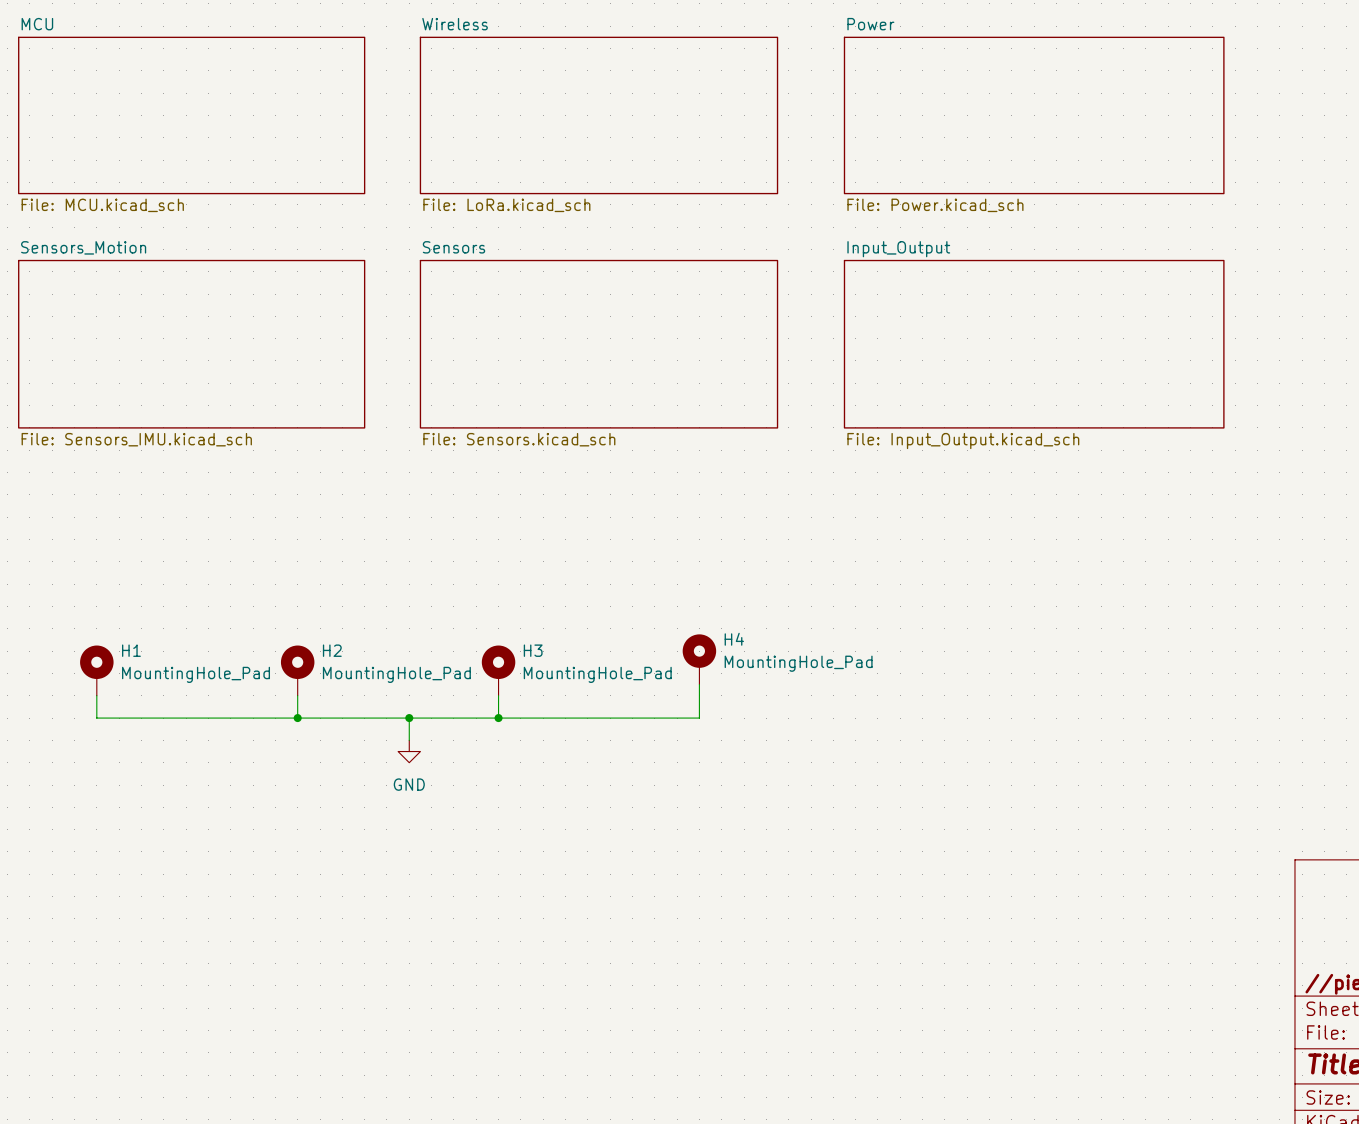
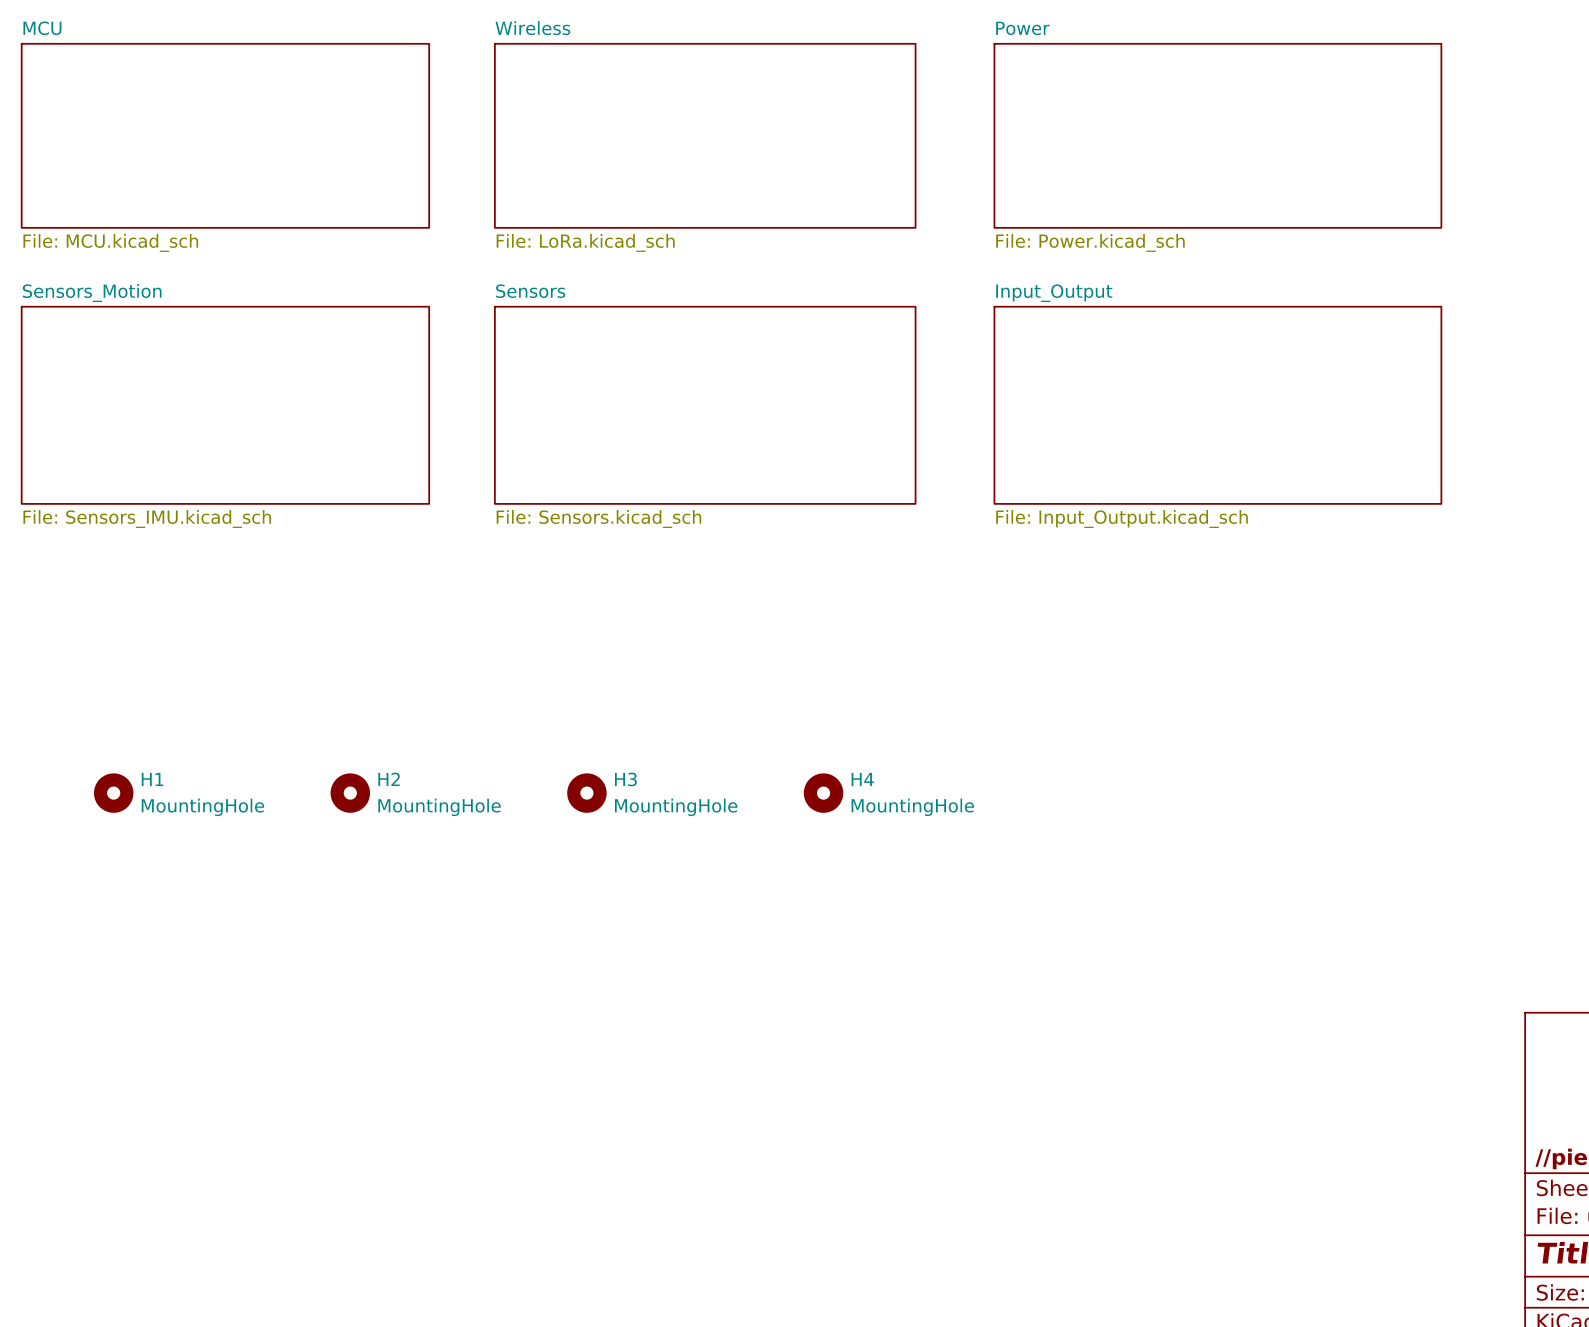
H4 symbol: [682, 634, 717, 685] -> [803, 773, 844, 813]
H1 symbol: [80, 645, 114, 696] -> [93, 773, 134, 813]
H2 symbol: [280, 645, 315, 696] -> [330, 773, 371, 813]
H3 symbol: [481, 645, 516, 696] -> [567, 773, 607, 813]
H4 value: MountingHole_Pad (798, 663) -> MountingHole (912, 807)
H1 value: MountingHole_Pad (196, 674) -> MountingHole (202, 807)
H2 value: MountingHole_Pad (396, 674) -> MountingHole (439, 807)
H3 value: MountingHole_Pad (597, 674) -> MountingHole (676, 807)
wire: (699, 684) (699, 718) (96, 718) (96, 695) -> none
wire: (297, 695) (297, 718) -> none
wire: (498, 695) (498, 718) -> none
junction: (297, 718) -> none
wire: (409, 718) (409, 740) -> none
junction: (409, 718) -> none
junction: (498, 718) -> none
power symbol: GND (409, 751) -> none

